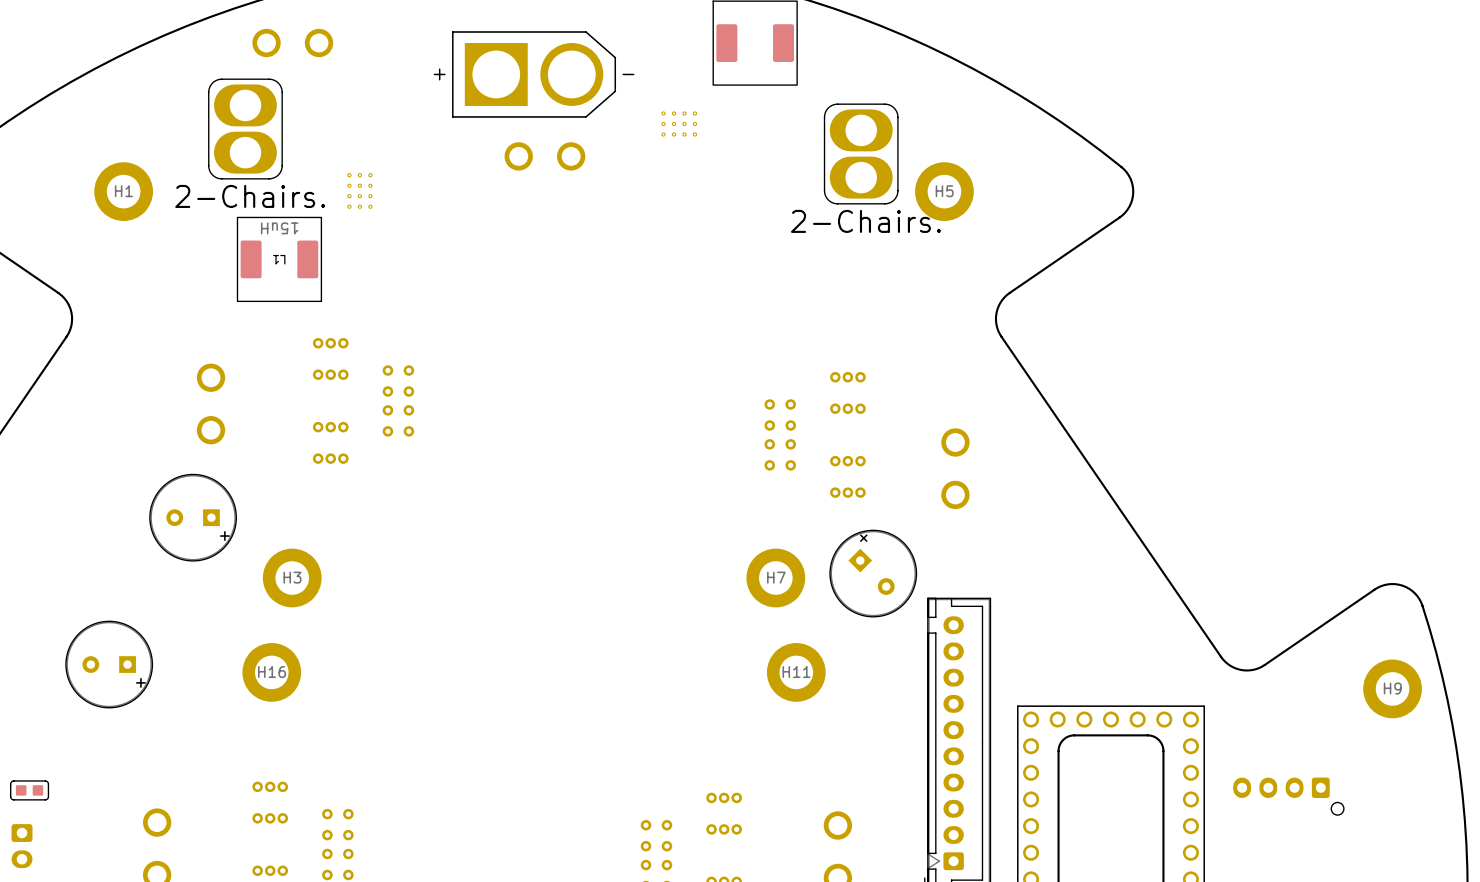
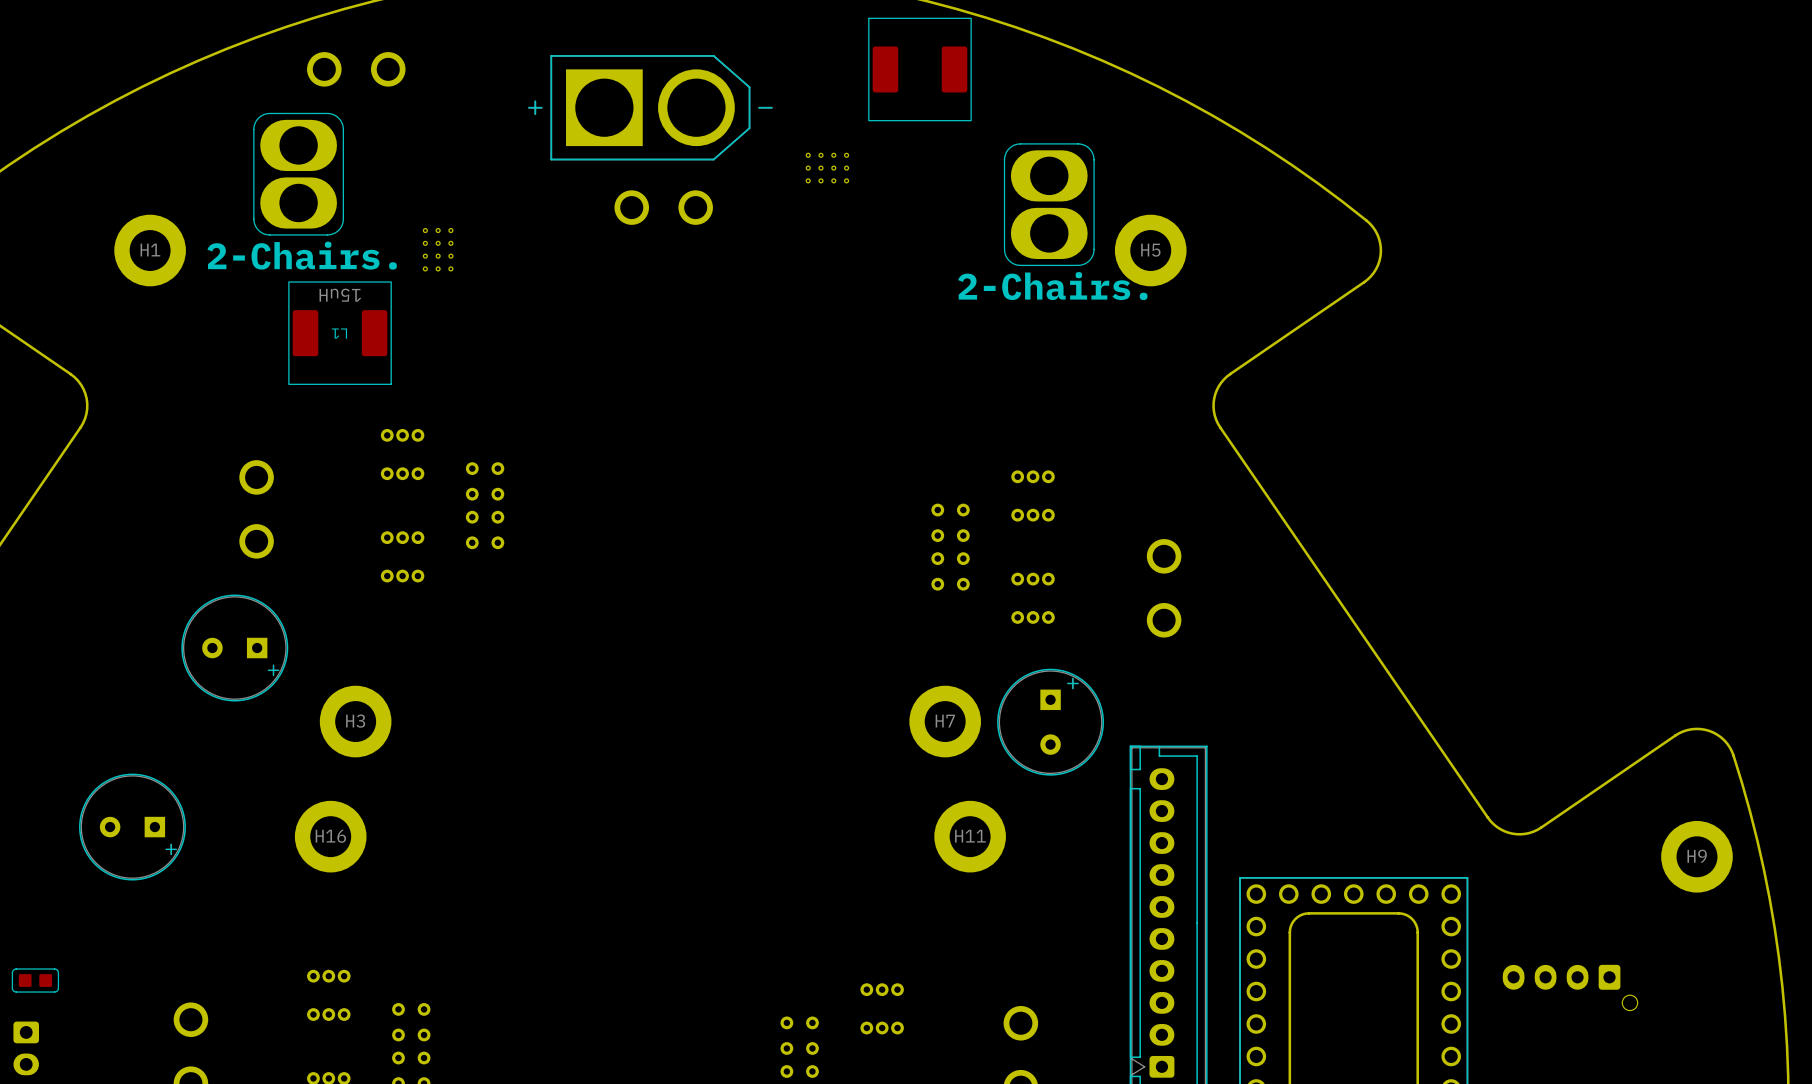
part: (873, 573) -> none
part: none -> (1050, 722)

